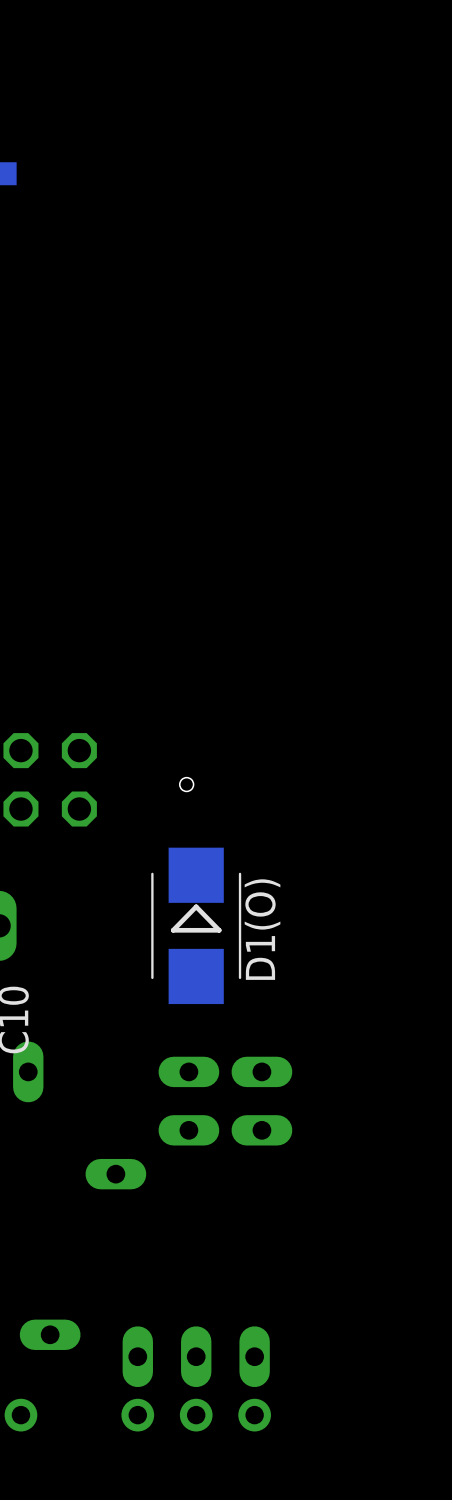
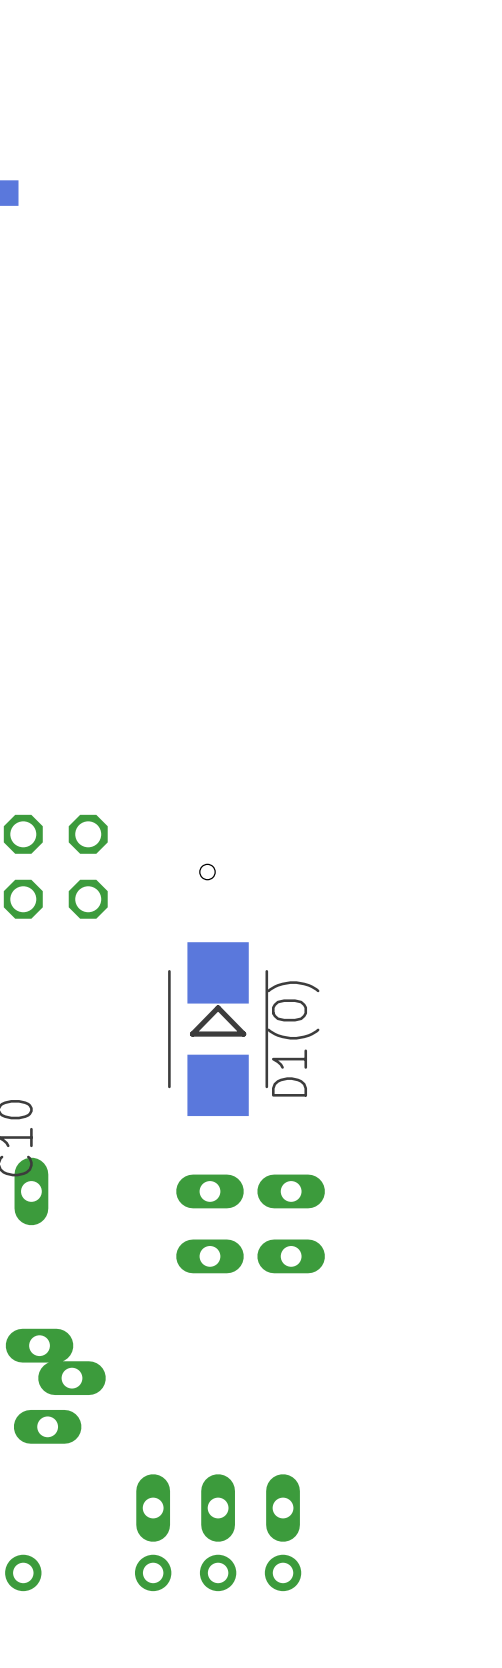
part: (115, 1174) -> none
part: none -> (39, 1345)
part: none -> (71, 1378)
part: none -> (47, 1426)
part: (50, 1334) -> none

